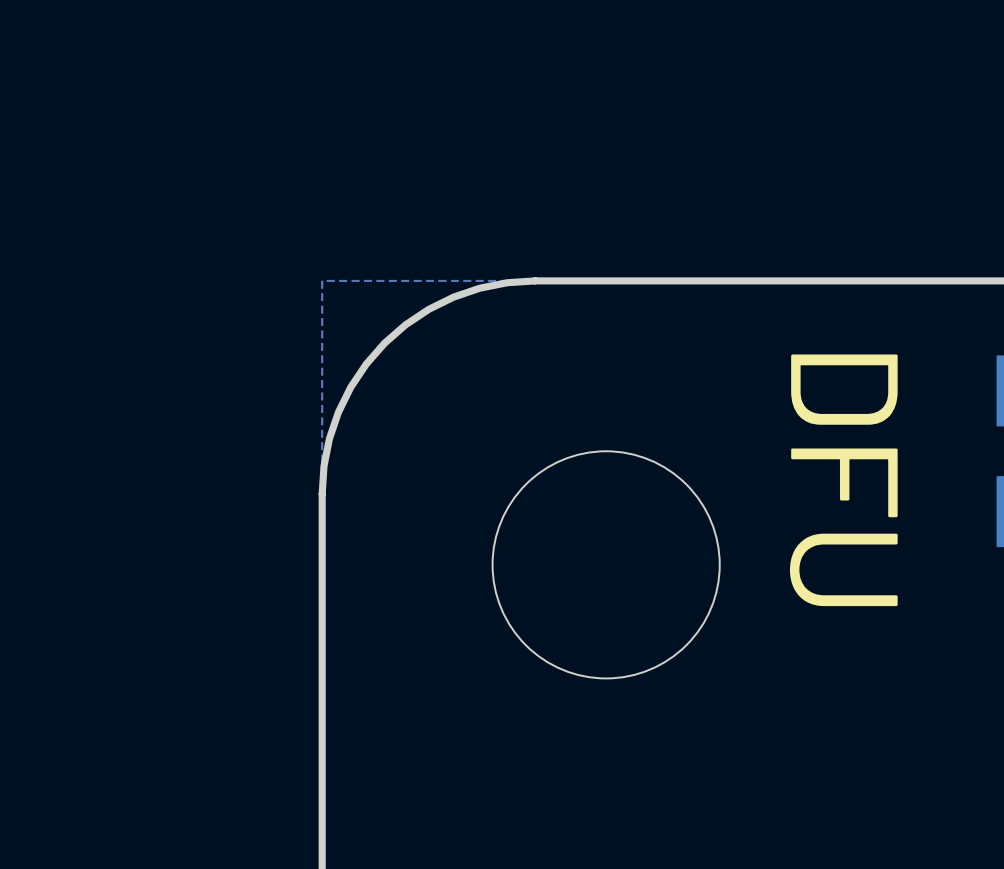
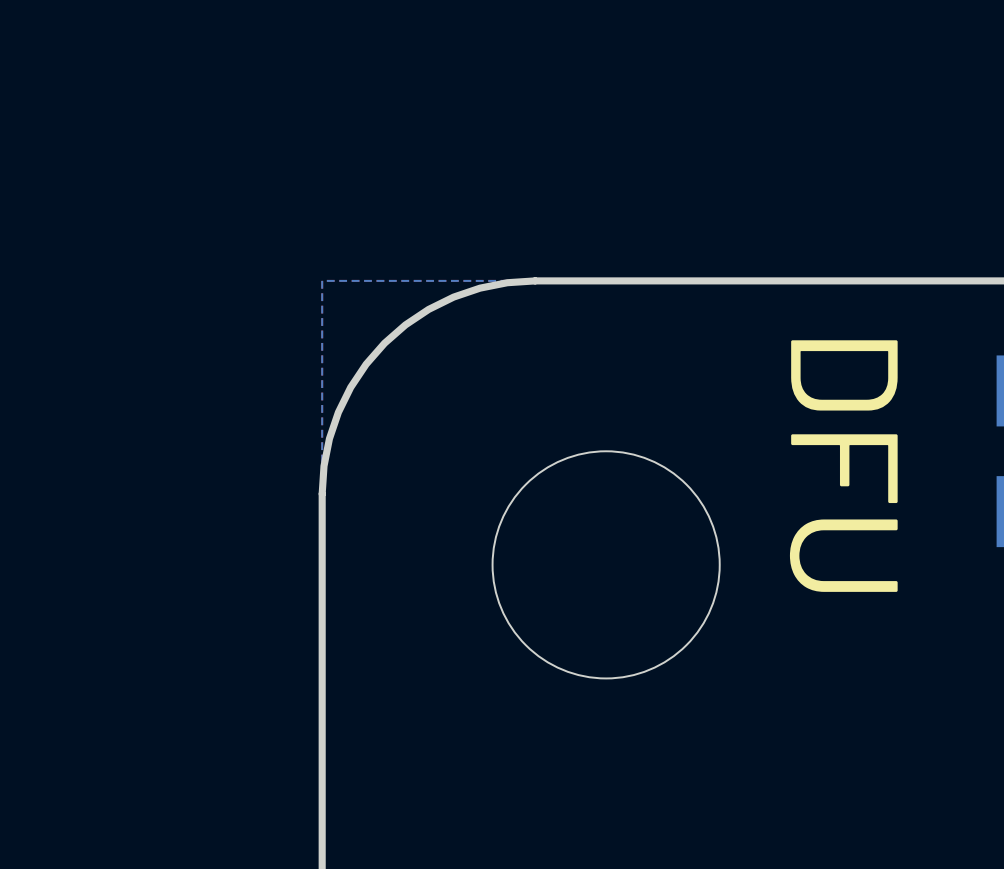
text position: DFU (843, 480) -> DFU (843, 466)

